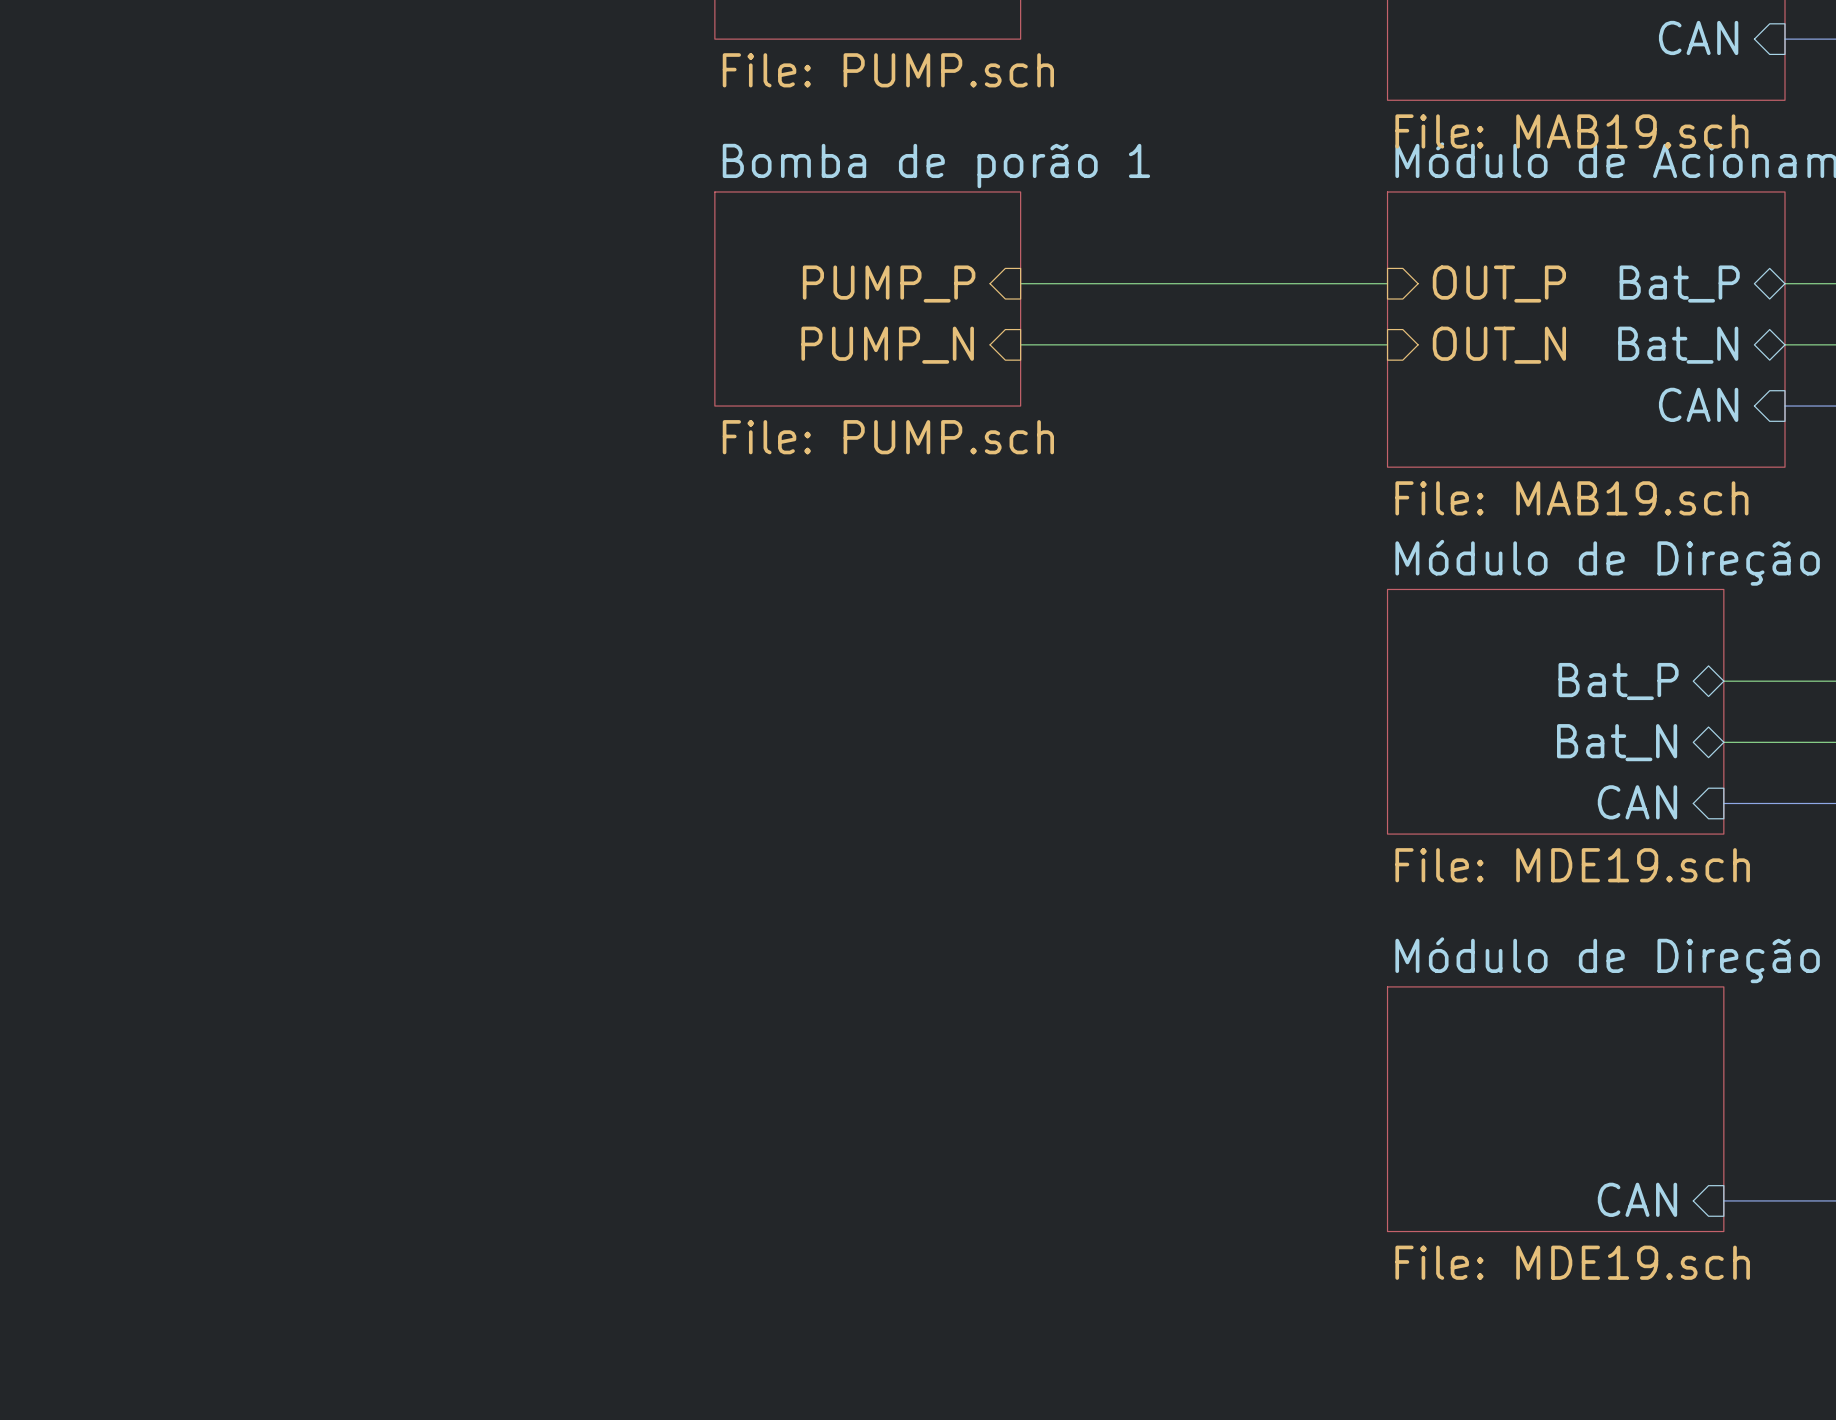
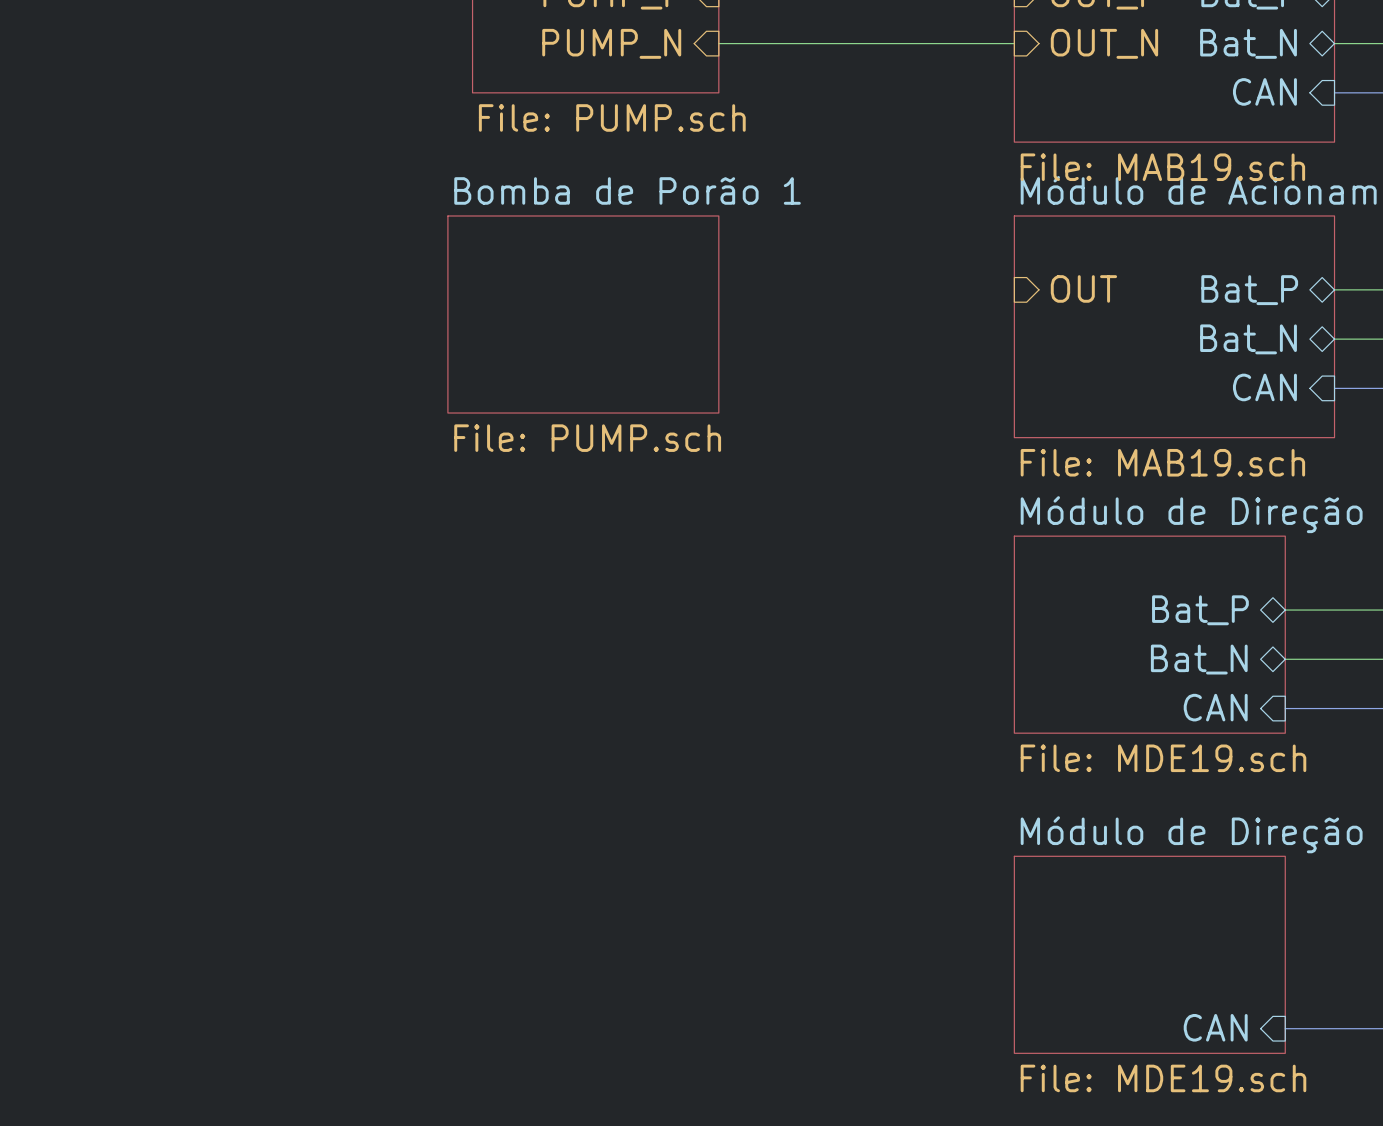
wire: (1020, 283) (1387, 283) -> none
hierarchical label: PUMP_P (889, 284) -> none
hierarchical label: OUT_P (1499, 284) -> OUT (1083, 288)
sheet Bomba de porão 1: File: PUMP.sch (867, 299) -> none
sheet Bomba de Porão 1: none -> File: PUMP.sch (583, 314)
wire: (1020, 344) (1387, 344) -> none
hierarchical label: PUMP_N (887, 345) -> none
hierarchical label: OUT_N (1499, 345) -> none

